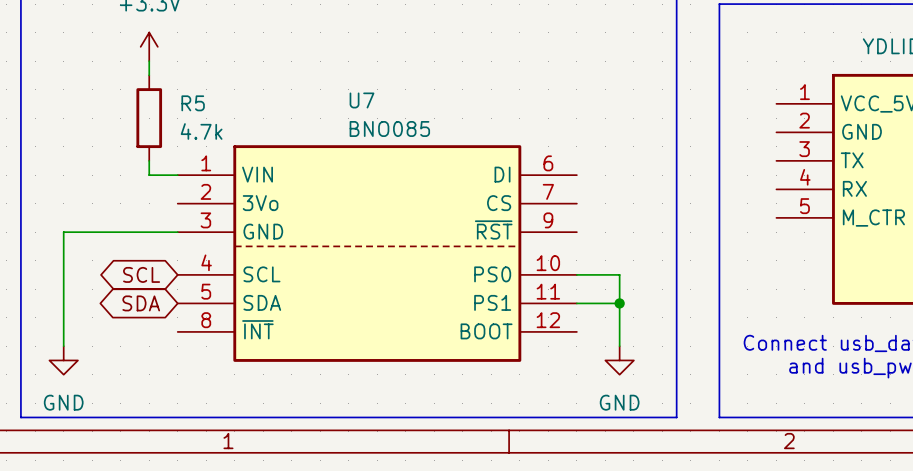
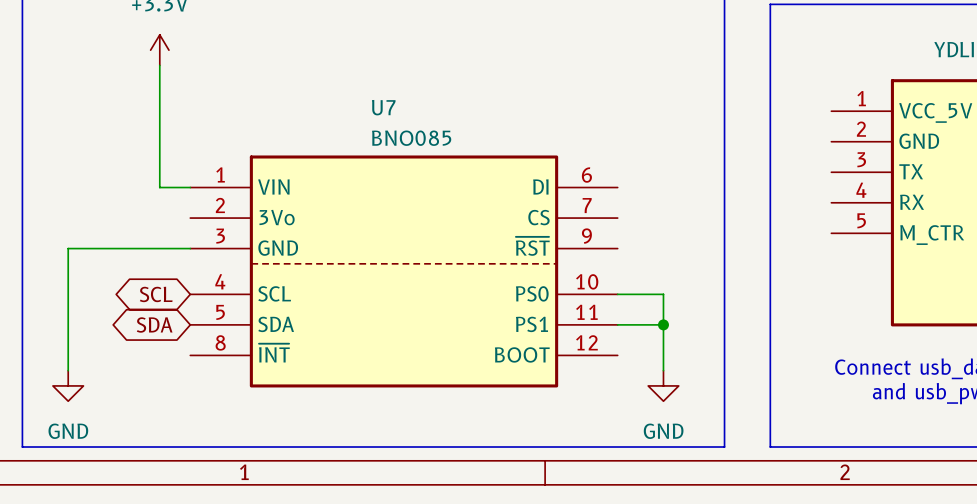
wire: none -> (159, 80) (159, 172)
R5: 4.7k (149, 118) -> none

